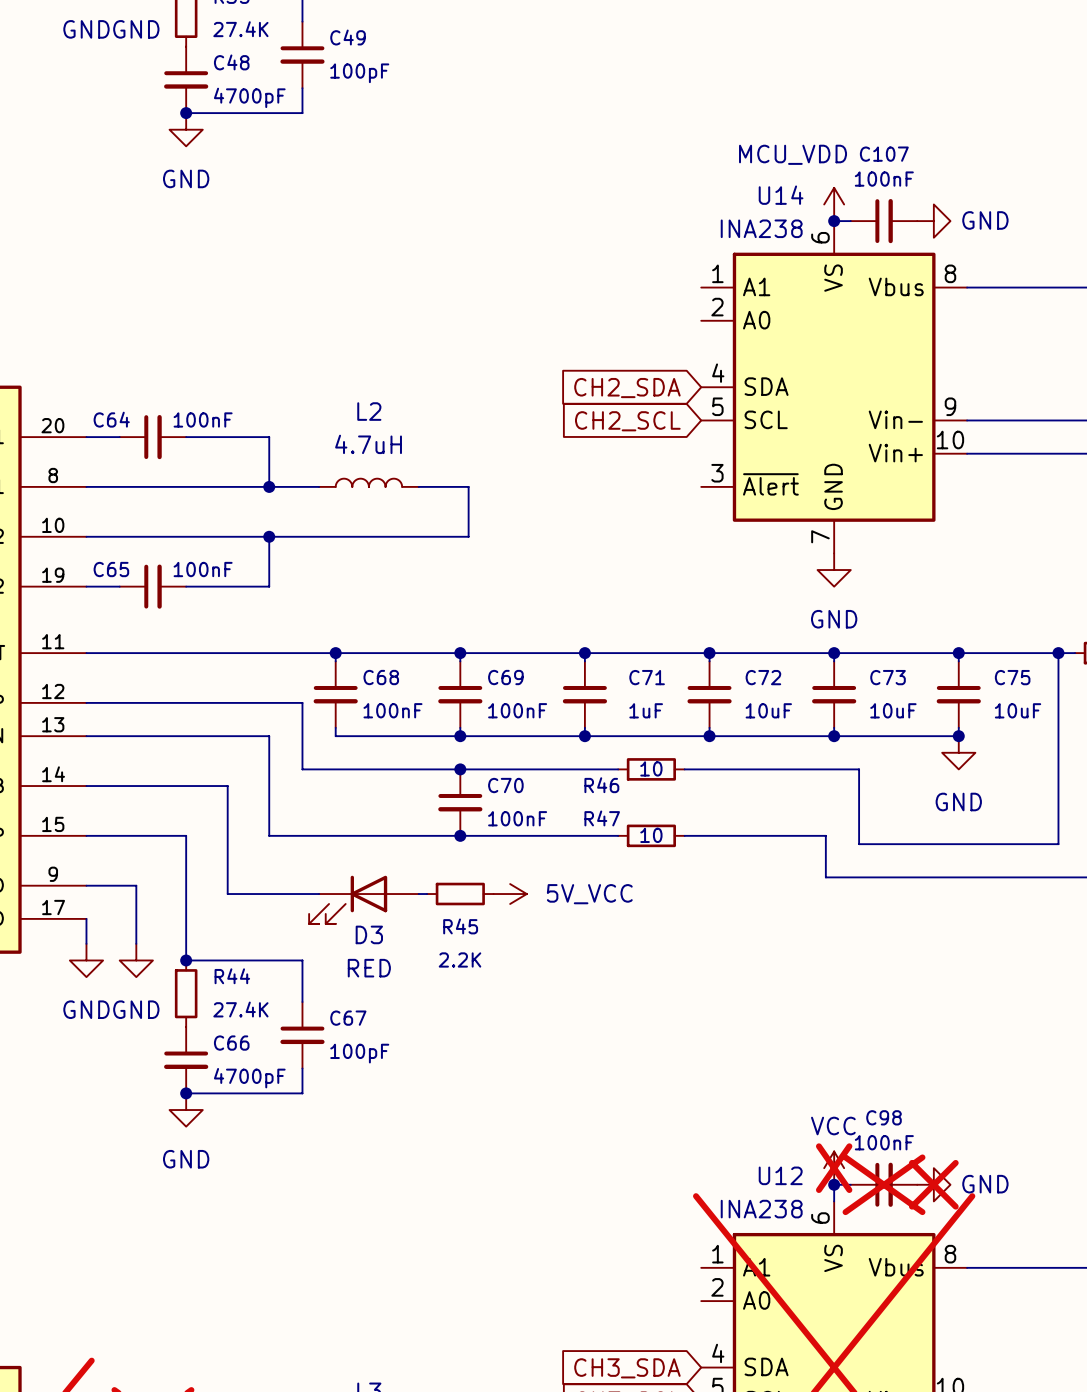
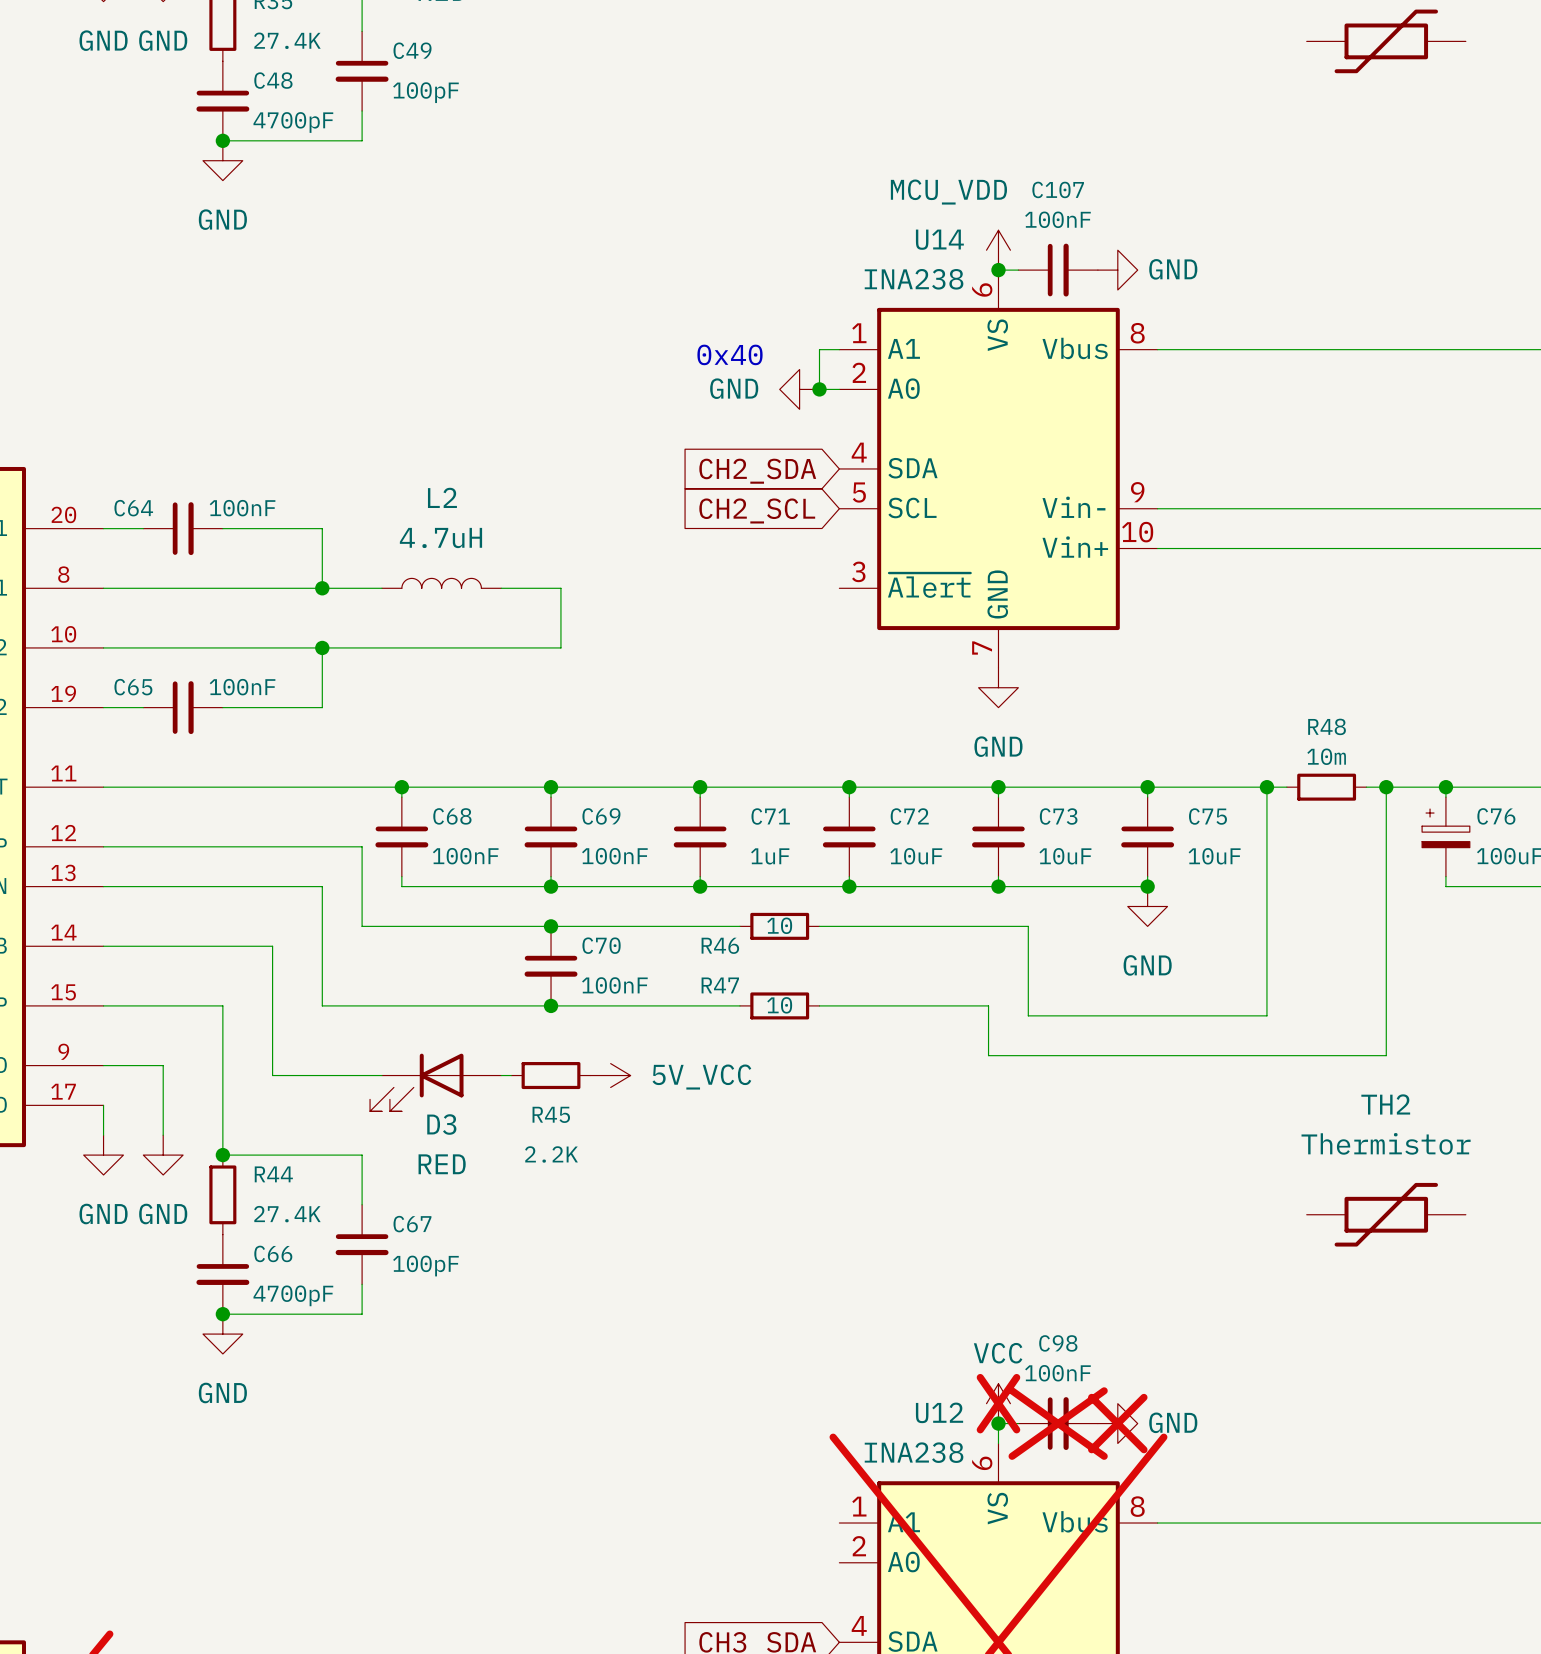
wire: none -> (839, 349) (819, 349) (819, 389) (839, 389)
text: none -> 0x40 (730, 354)
power symbol: none -> GND (799, 389)
junction: none -> (819, 389)

